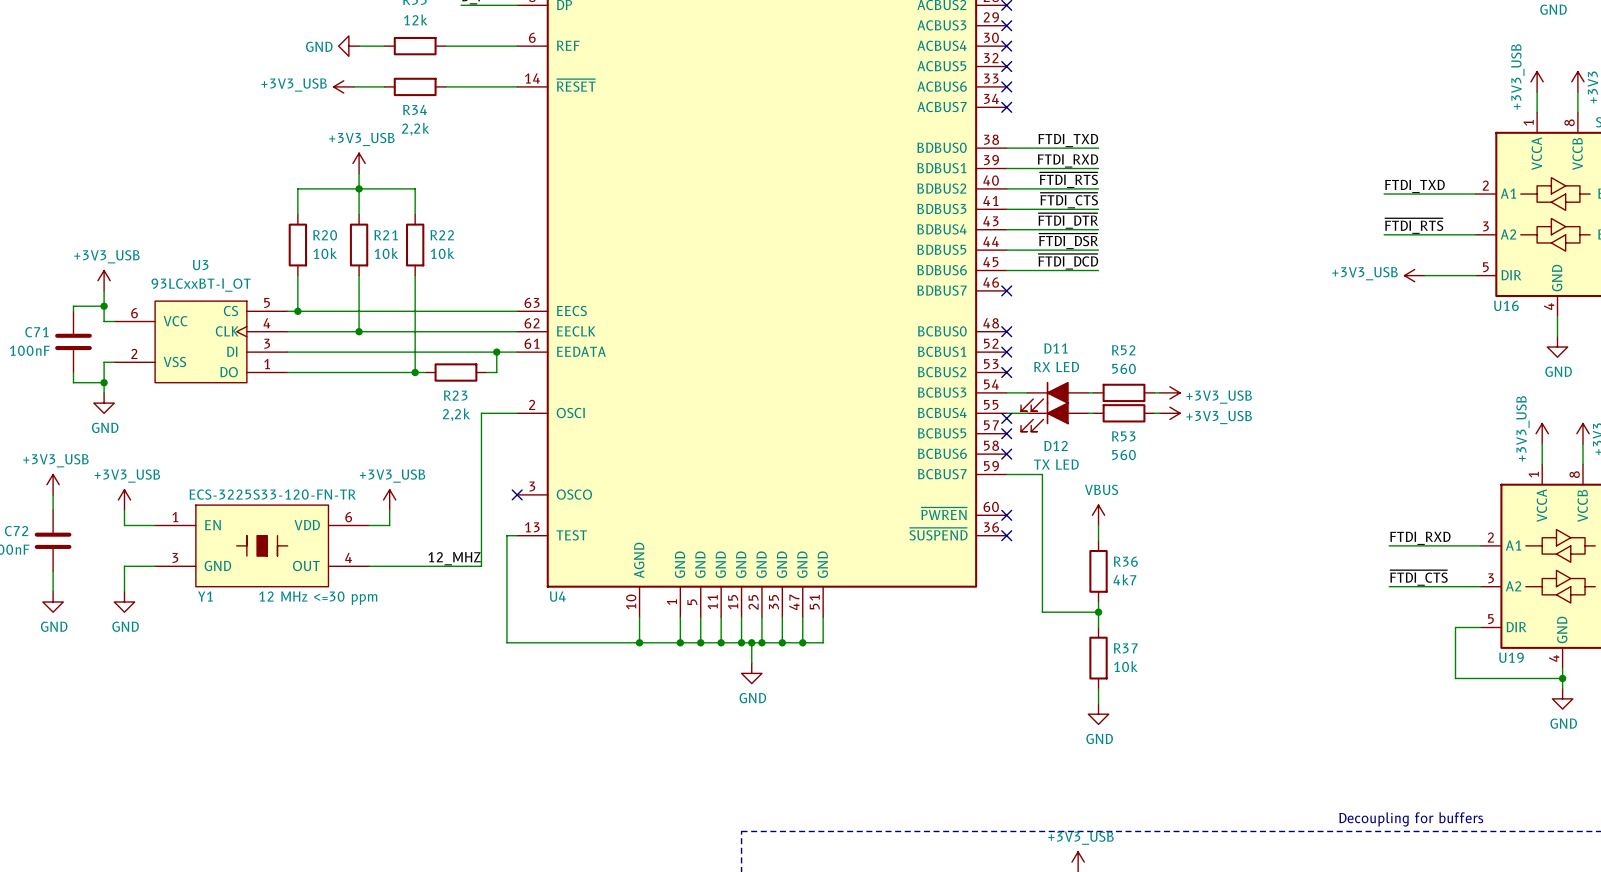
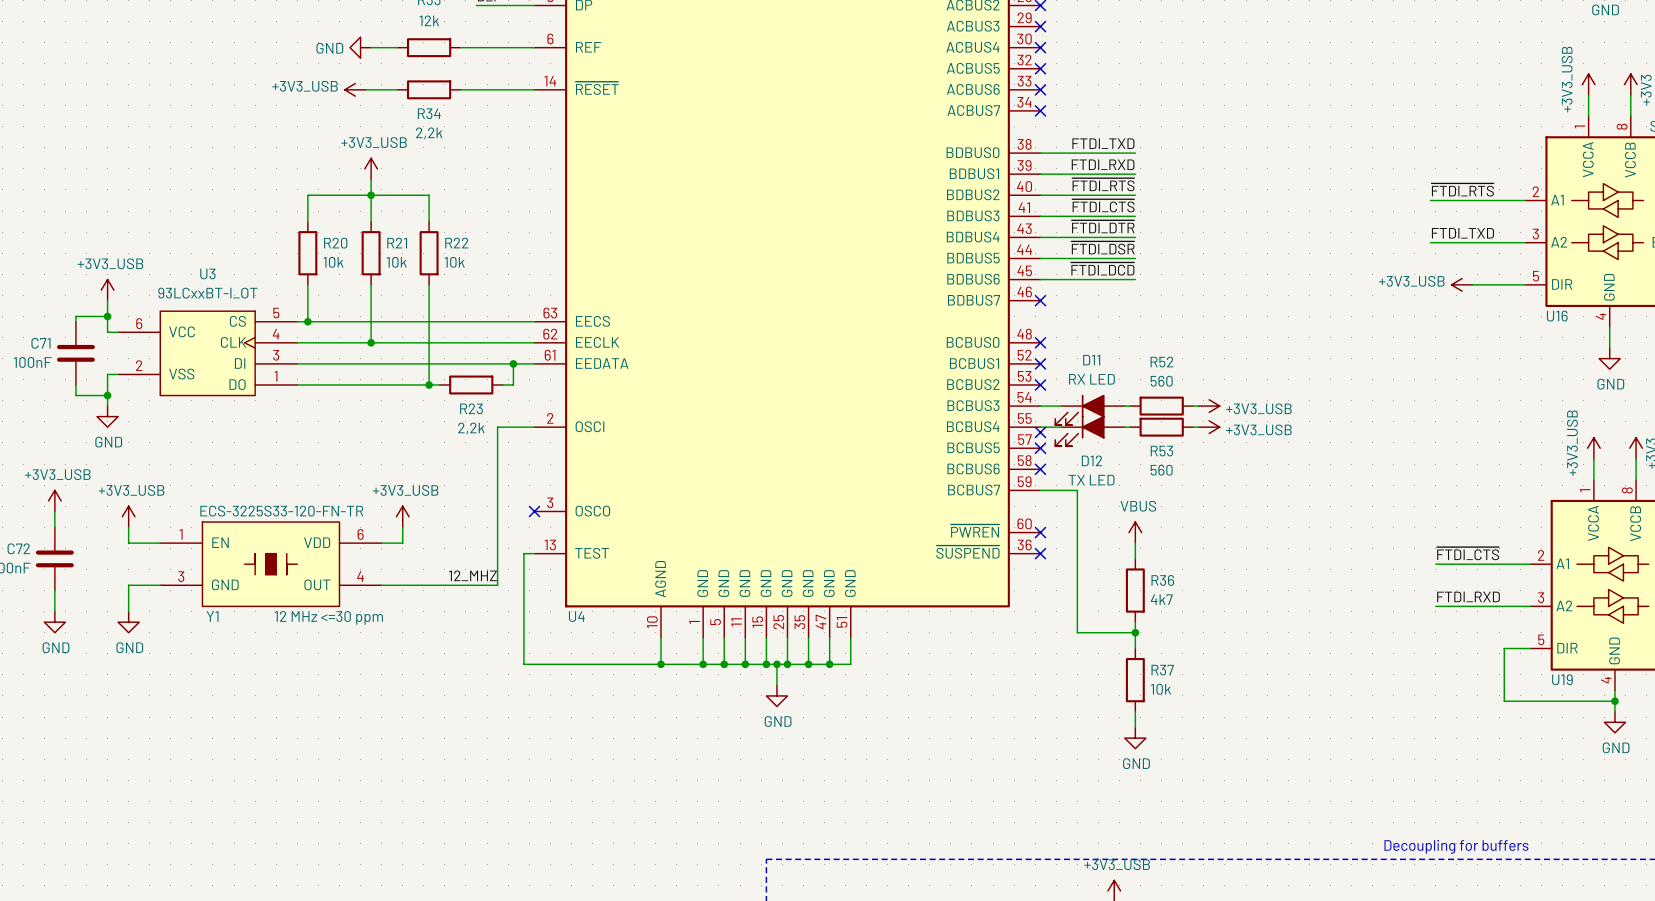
label: FTDI_TXD (1414, 186) -> ~{FTDI_RTS} (1462, 189)
label: ~{FTDI_RTS} (1414, 226) -> FTDI_TXD (1462, 233)
label: FTDI_RXD (1420, 538) -> ~{FTDI_CTS} (1467, 553)
label: ~{FTDI_CTS} (1418, 577) -> FTDI_RXD (1468, 596)

